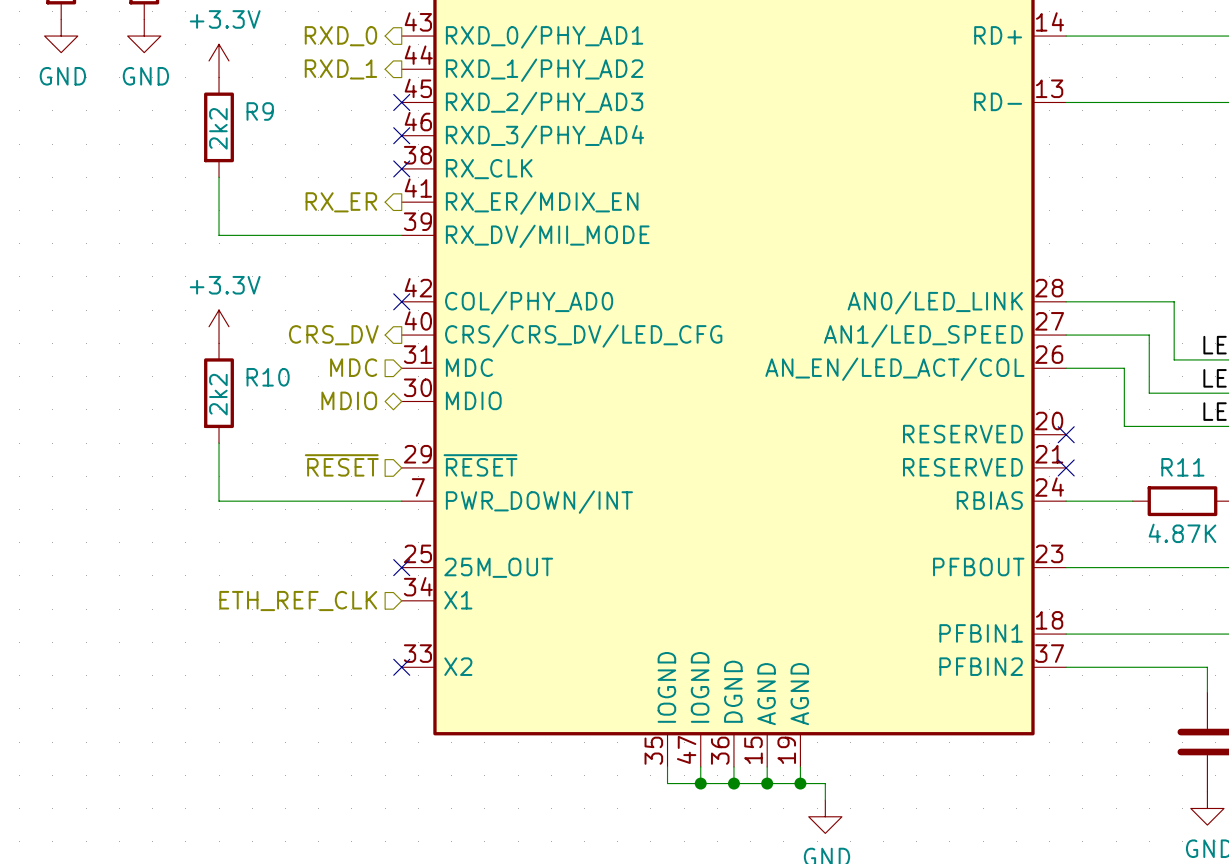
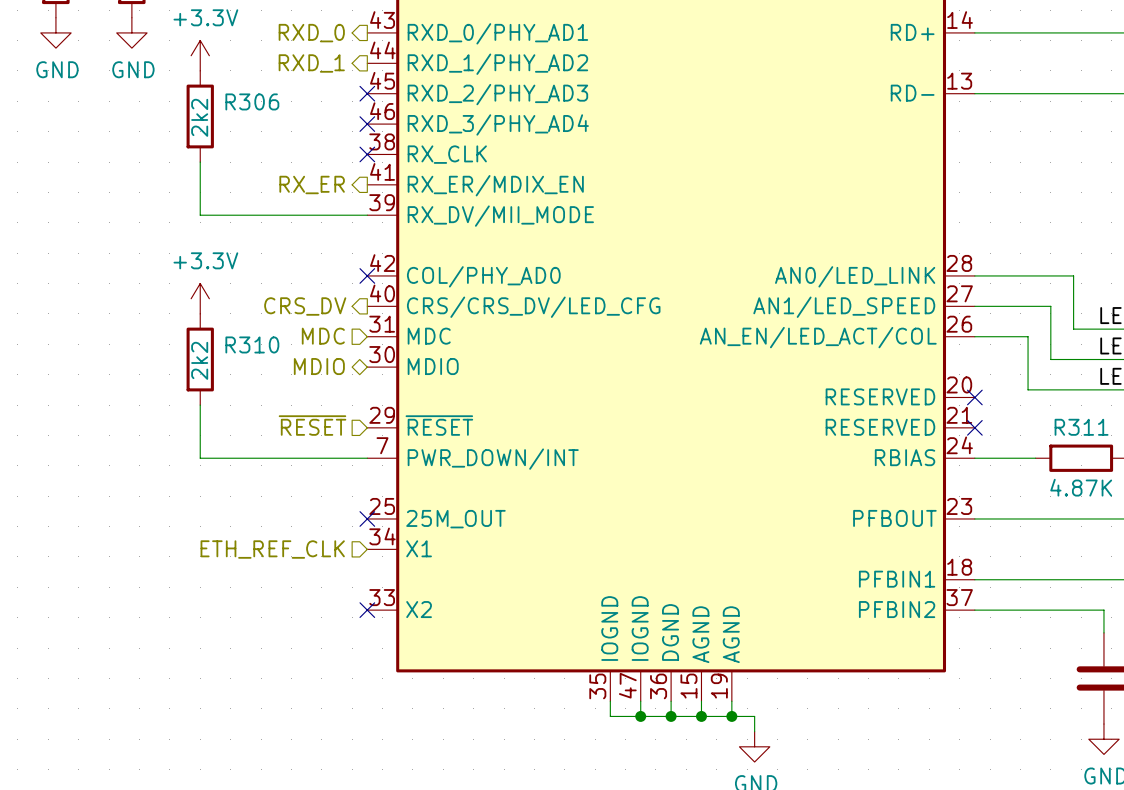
R9 name: R9 (260, 111) -> R306 (252, 101)
R10 name: R10 (268, 377) -> R310 (252, 344)
R11 name: R11 (1182, 467) -> R311 (1081, 427)

